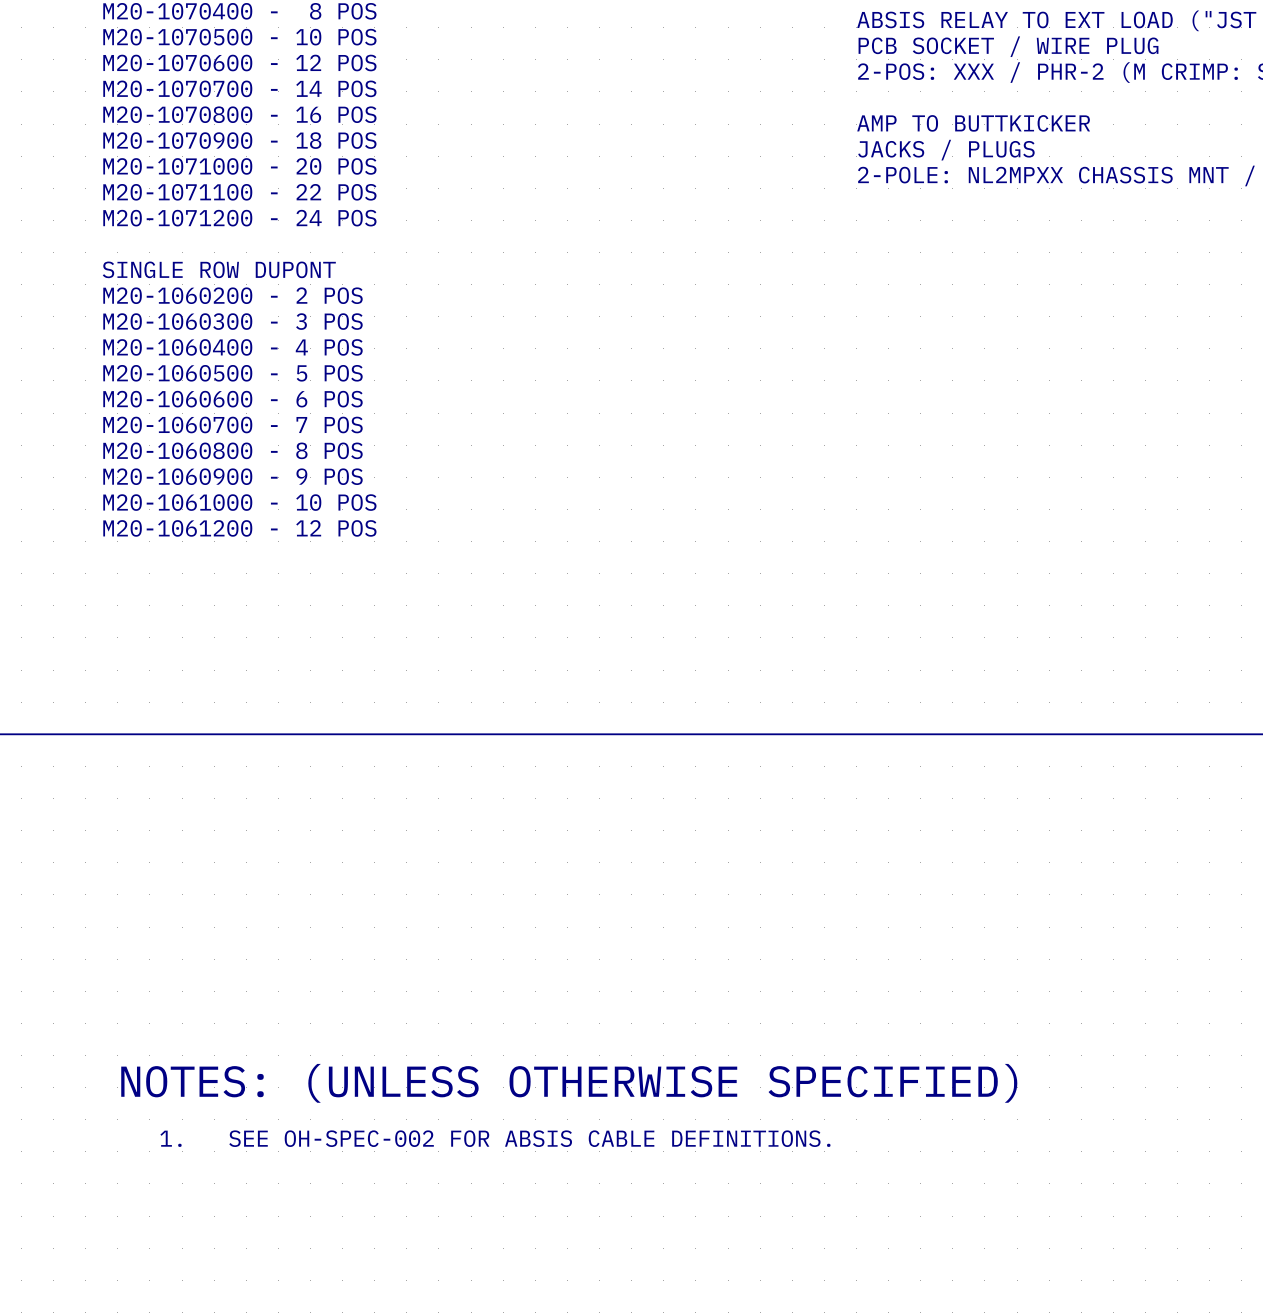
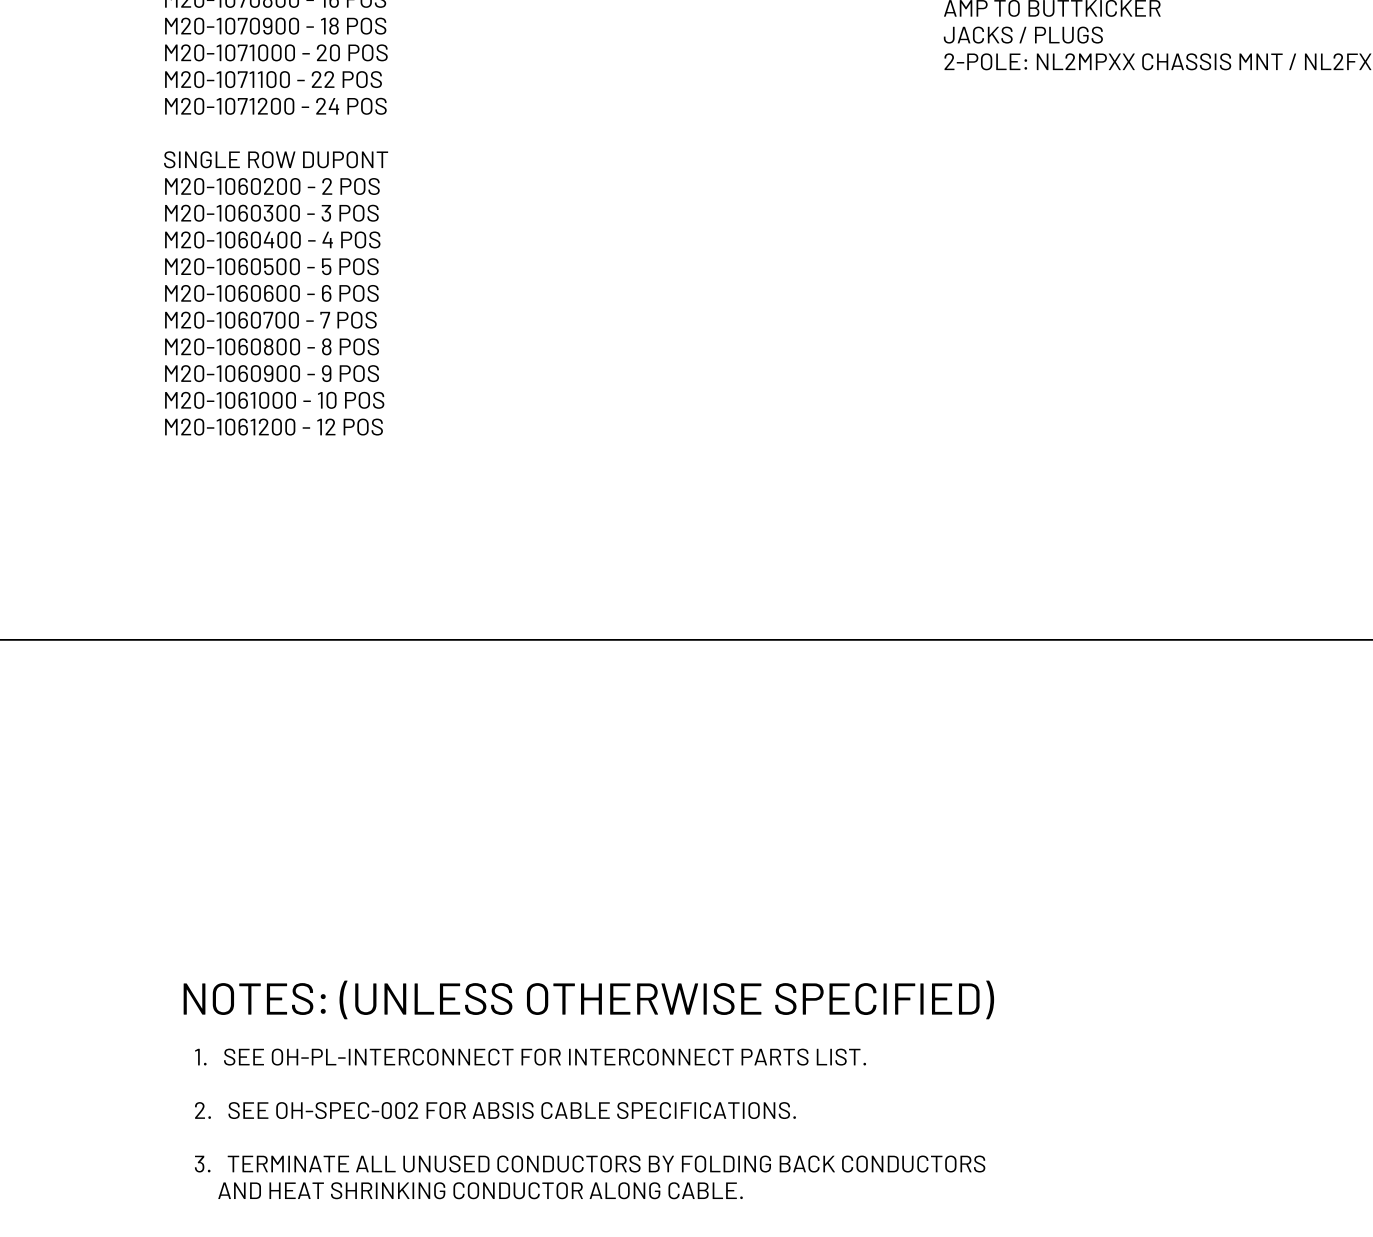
text: 1. SEE OH-SPEC-002 FOR ABSIS CABLE DEFINITIONS. (495, 1138) -> 1. SEE OH-PL-INTERCONNECT FOR INTERCONNECT PARTS LIST. (530, 1057)
text: none -> 2. SEE OH-SPEC-002 FOR ABSIS CABLE SPECIFICATIONS. (495, 1110)
text: none -> 3. TERMINATE ALL UNUSED CONDUCTORS BY FOLDING BACK CONDUCTORS (590, 1164)
text: none -> AND HEAT SHRINKING CONDUCTOR ALONG CABLE. (480, 1190)

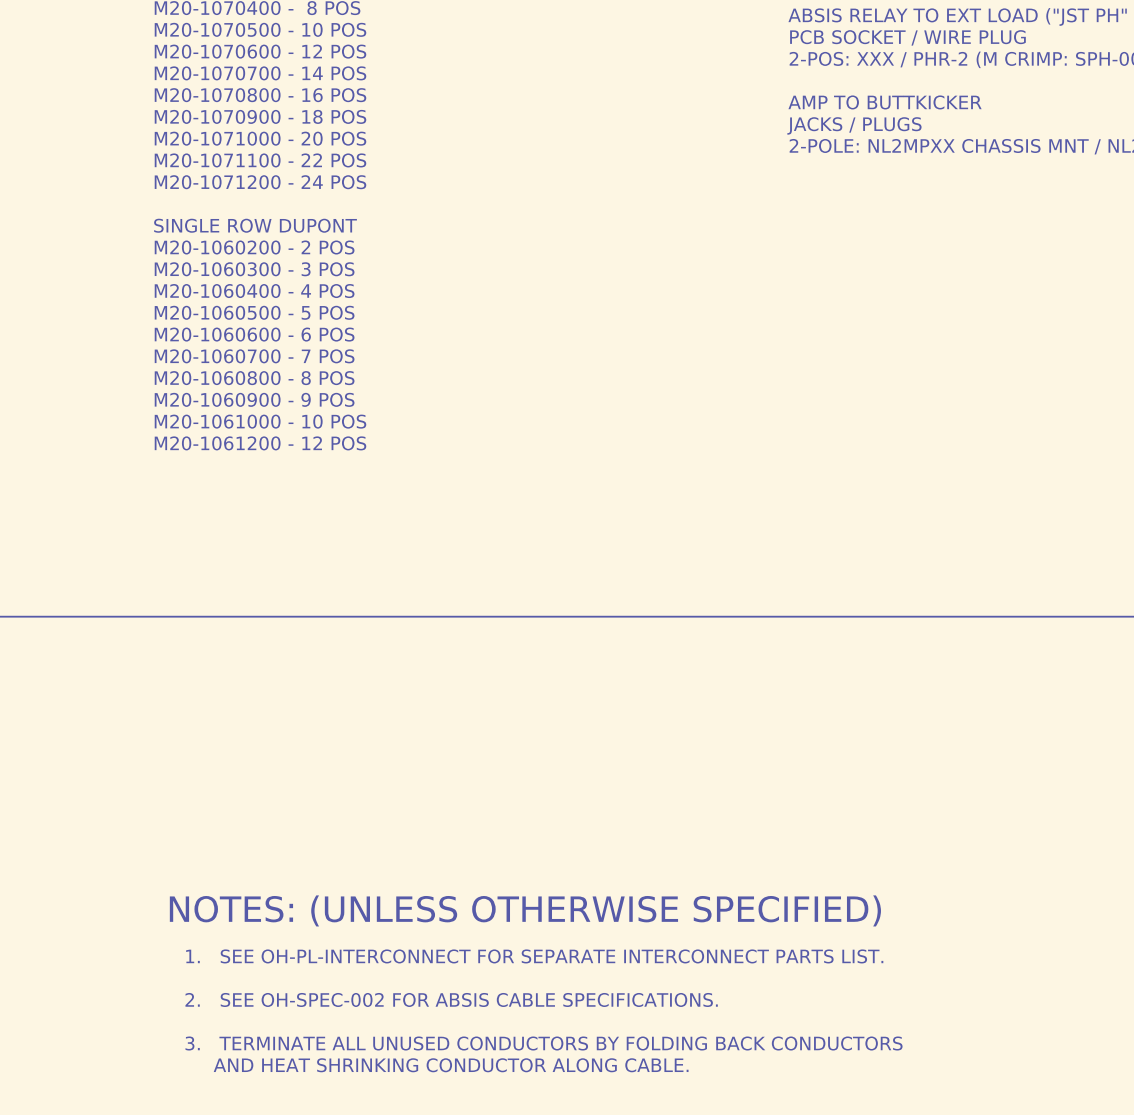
text: 1. SEE OH-PL-INTERCONNECT FOR INTERCONNECT PARTS LIST. (530, 1057) -> 1. SEE OH-PL-INTERCONNECT FOR SEPARATE INTERCONNECT PARTS LIST. (534, 956)

